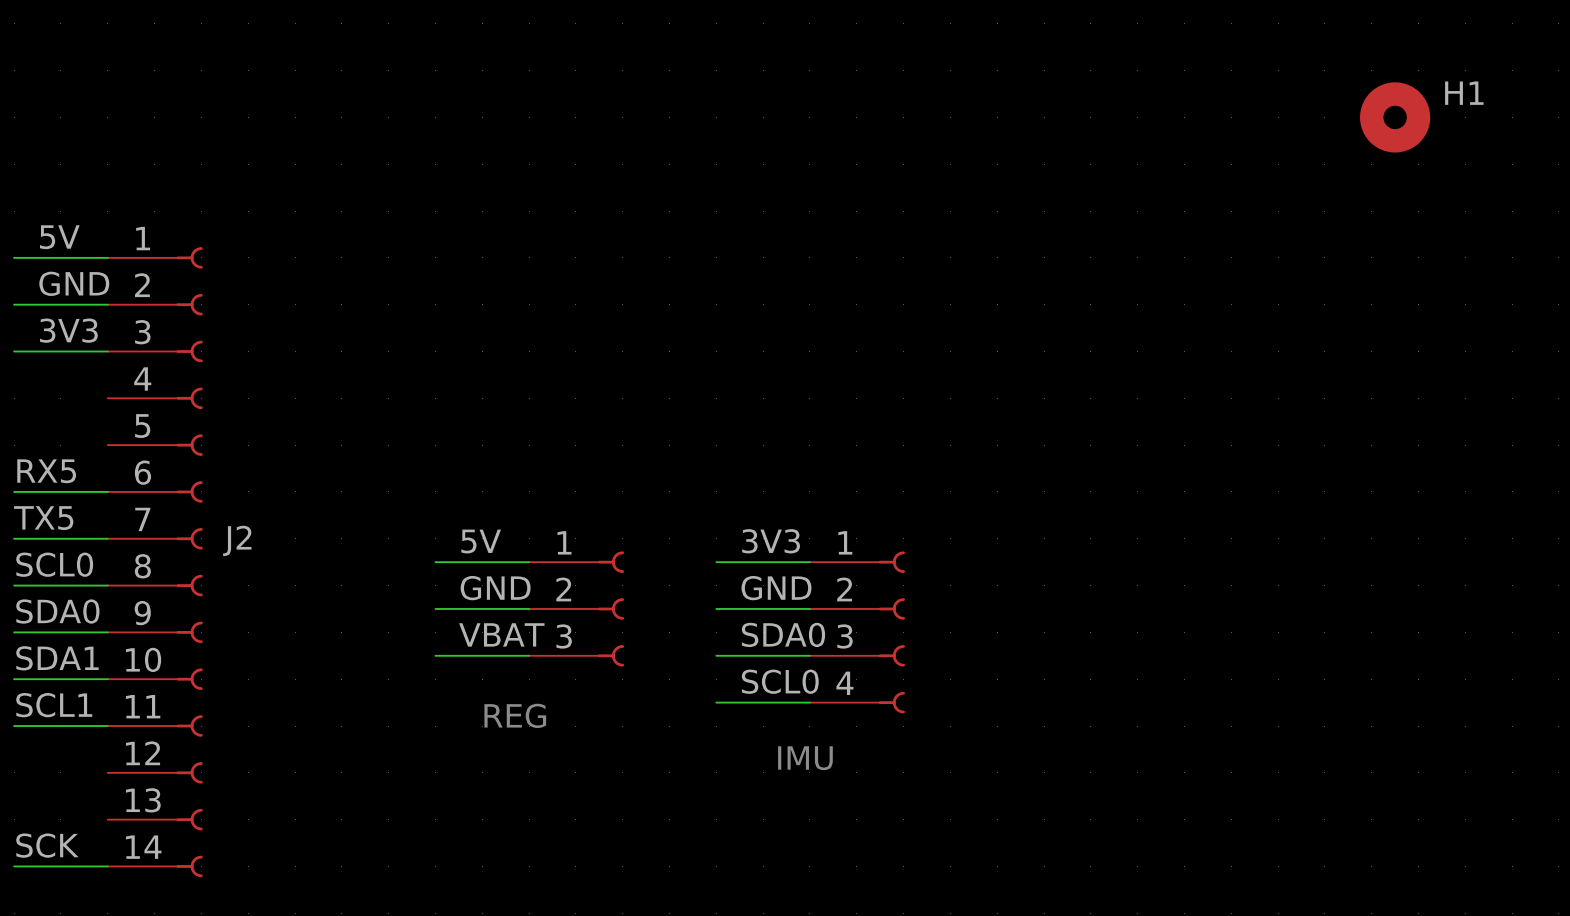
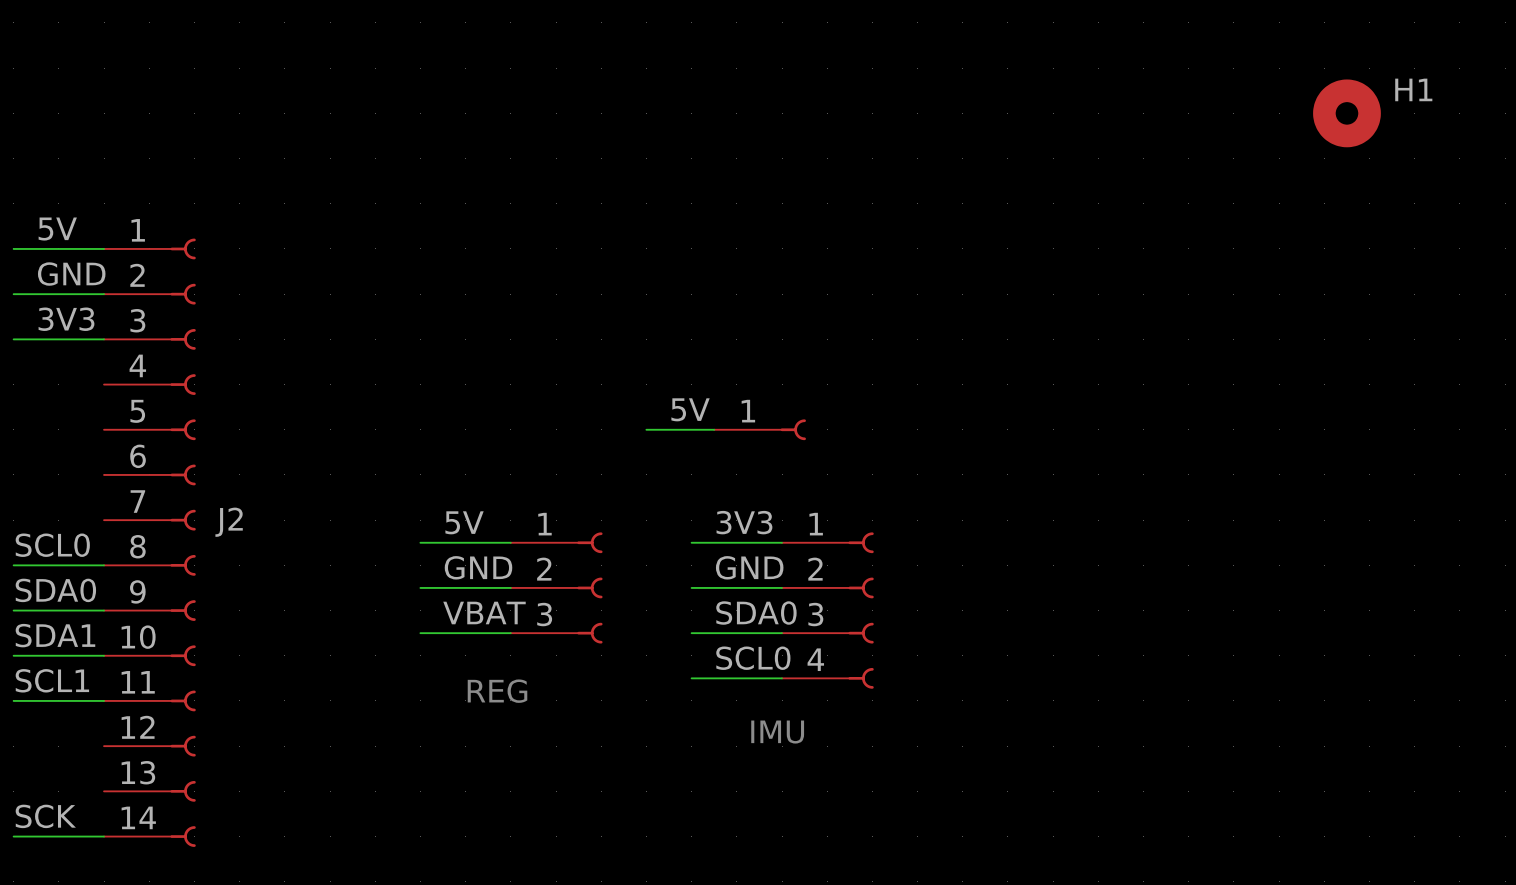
label: none -> 5V (690, 409)
wire: none -> (646, 429) (714, 429)
part: none -> (760, 429)
label: RX5 (46, 471) -> none
wire: (14, 491) (107, 491) -> none
label: TX5 (43, 518) -> none
wire: (14, 538) (107, 538) -> none

